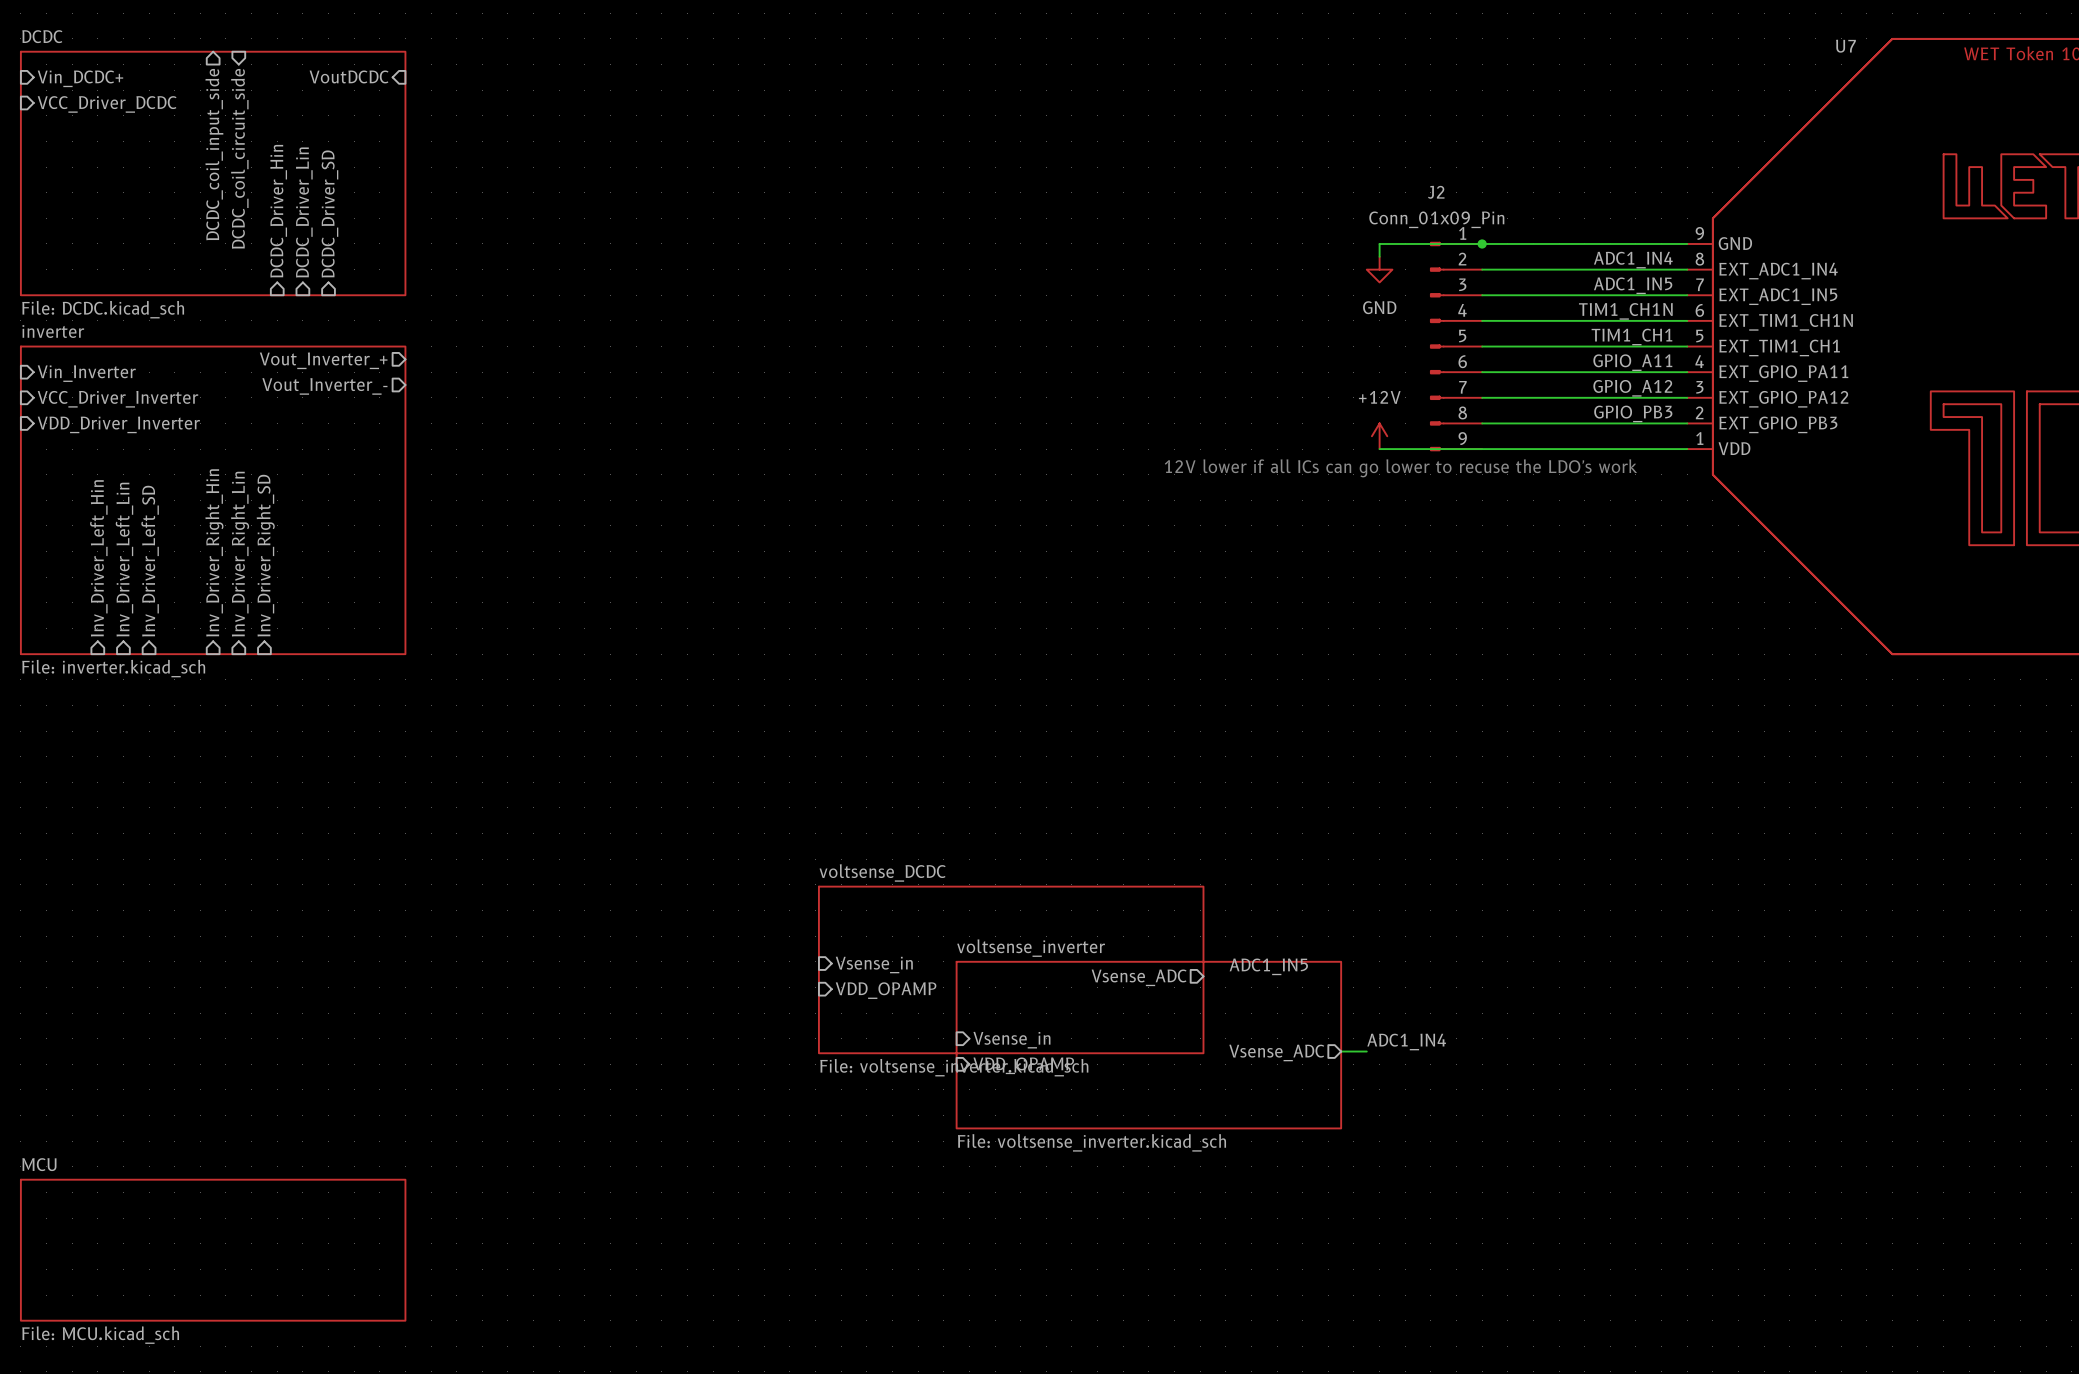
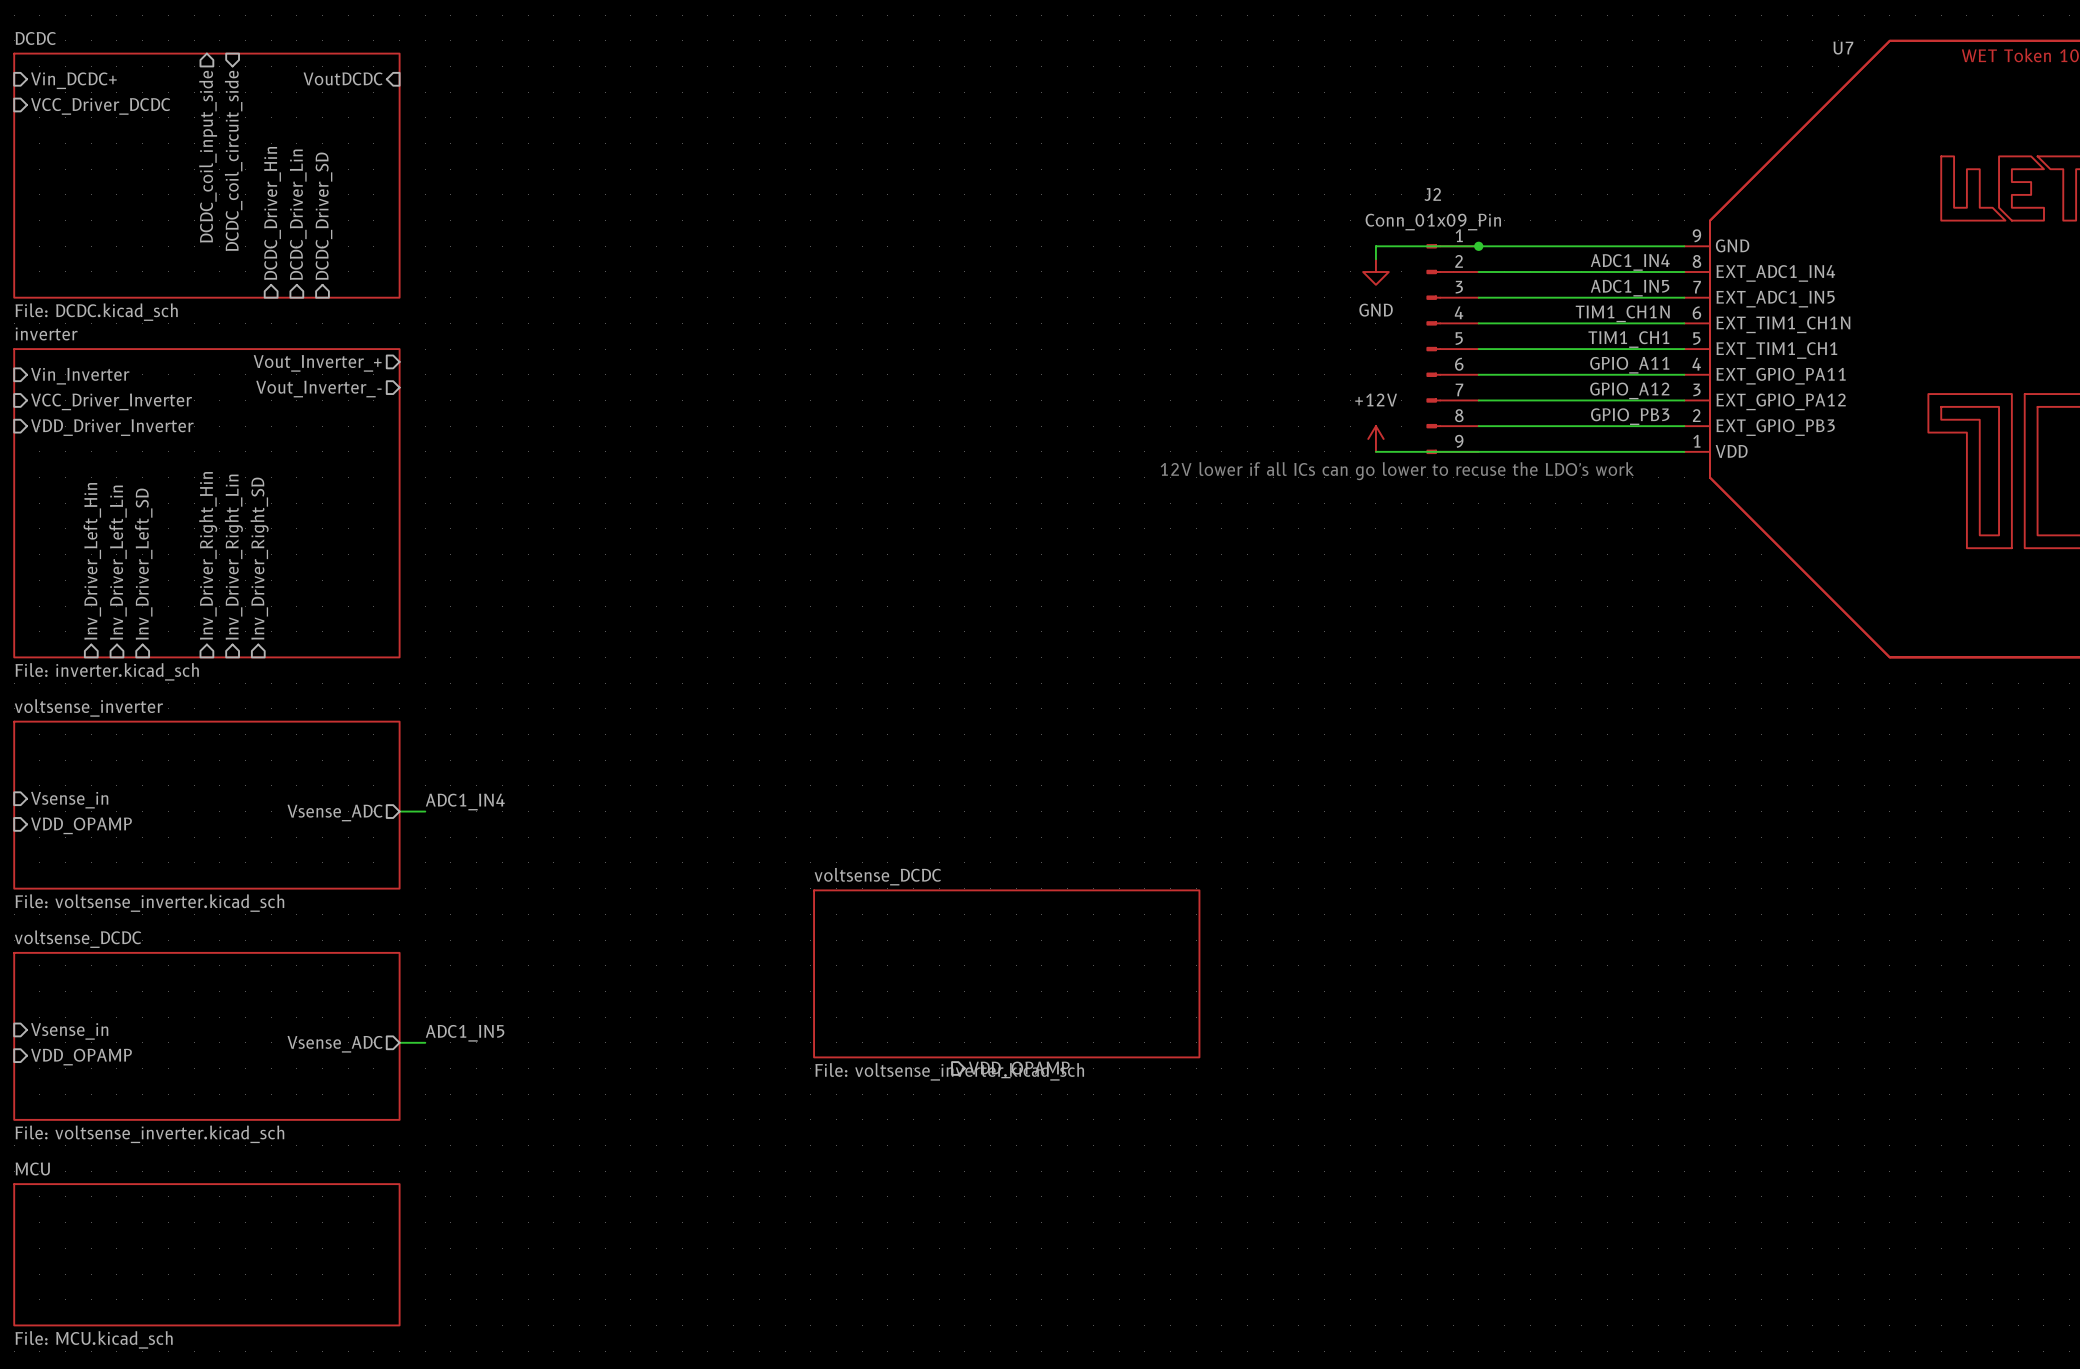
sheet pin: none -> Vsense_in (69, 800)
label: none -> ADC1_IN4 (465, 802)
sheet voltsense_inverter: none -> File: voltsense_inverter.kicad_sch (206, 805)
wire: none -> (399, 811) (425, 811)
sheet pin: none -> Vsense_ADC (335, 813)
sheet pin: none -> VDD_OPAMP (81, 825)
sheet pin: Vsense_in (874, 964) -> none
label: ADC1_IN5 (1268, 966) -> none
sheet pin: Vsense_ADC (1139, 977) -> none
sheet pin: VDD_OPAMP (886, 990) -> none
sheet pin: none -> Vsense_in (69, 1031)
label: none -> ADC1_IN5 (465, 1033)
sheet voltsense_DCDC: none -> File: voltsense_inverter.kicad_sch (206, 1036)
wire: none -> (399, 1042) (425, 1042)
sheet pin: none -> Vsense_ADC (335, 1044)
sheet pin: Vsense_in (1011, 1040) -> none
label: ADC1_IN4 (1406, 1042) -> none
sheet voltsense_inverter: File: voltsense_inverter.kicad_sch (1148, 1045) -> none
wire: (1341, 1051) (1366, 1051) -> none
sheet pin: none -> VDD_OPAMP (81, 1057)
sheet pin: Vsense_ADC (1276, 1052) -> none

